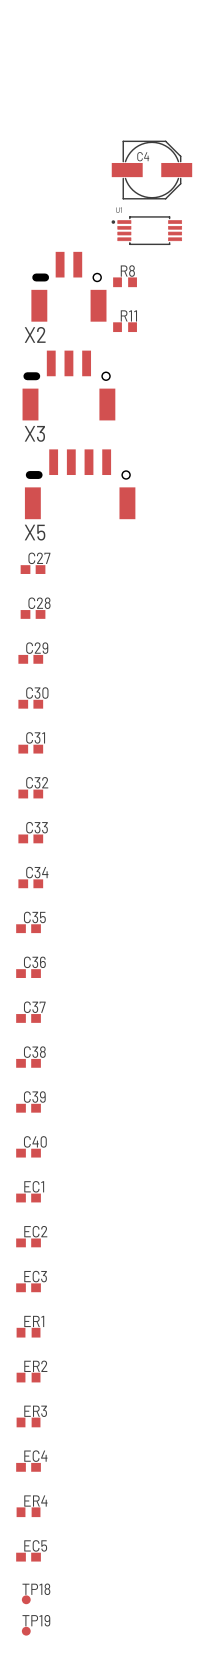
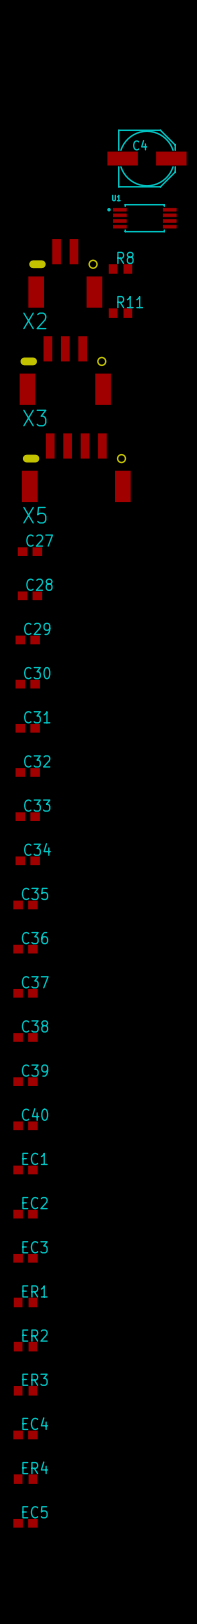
TP18: (26, 1599) -> none
TP19: (26, 1631) -> none

